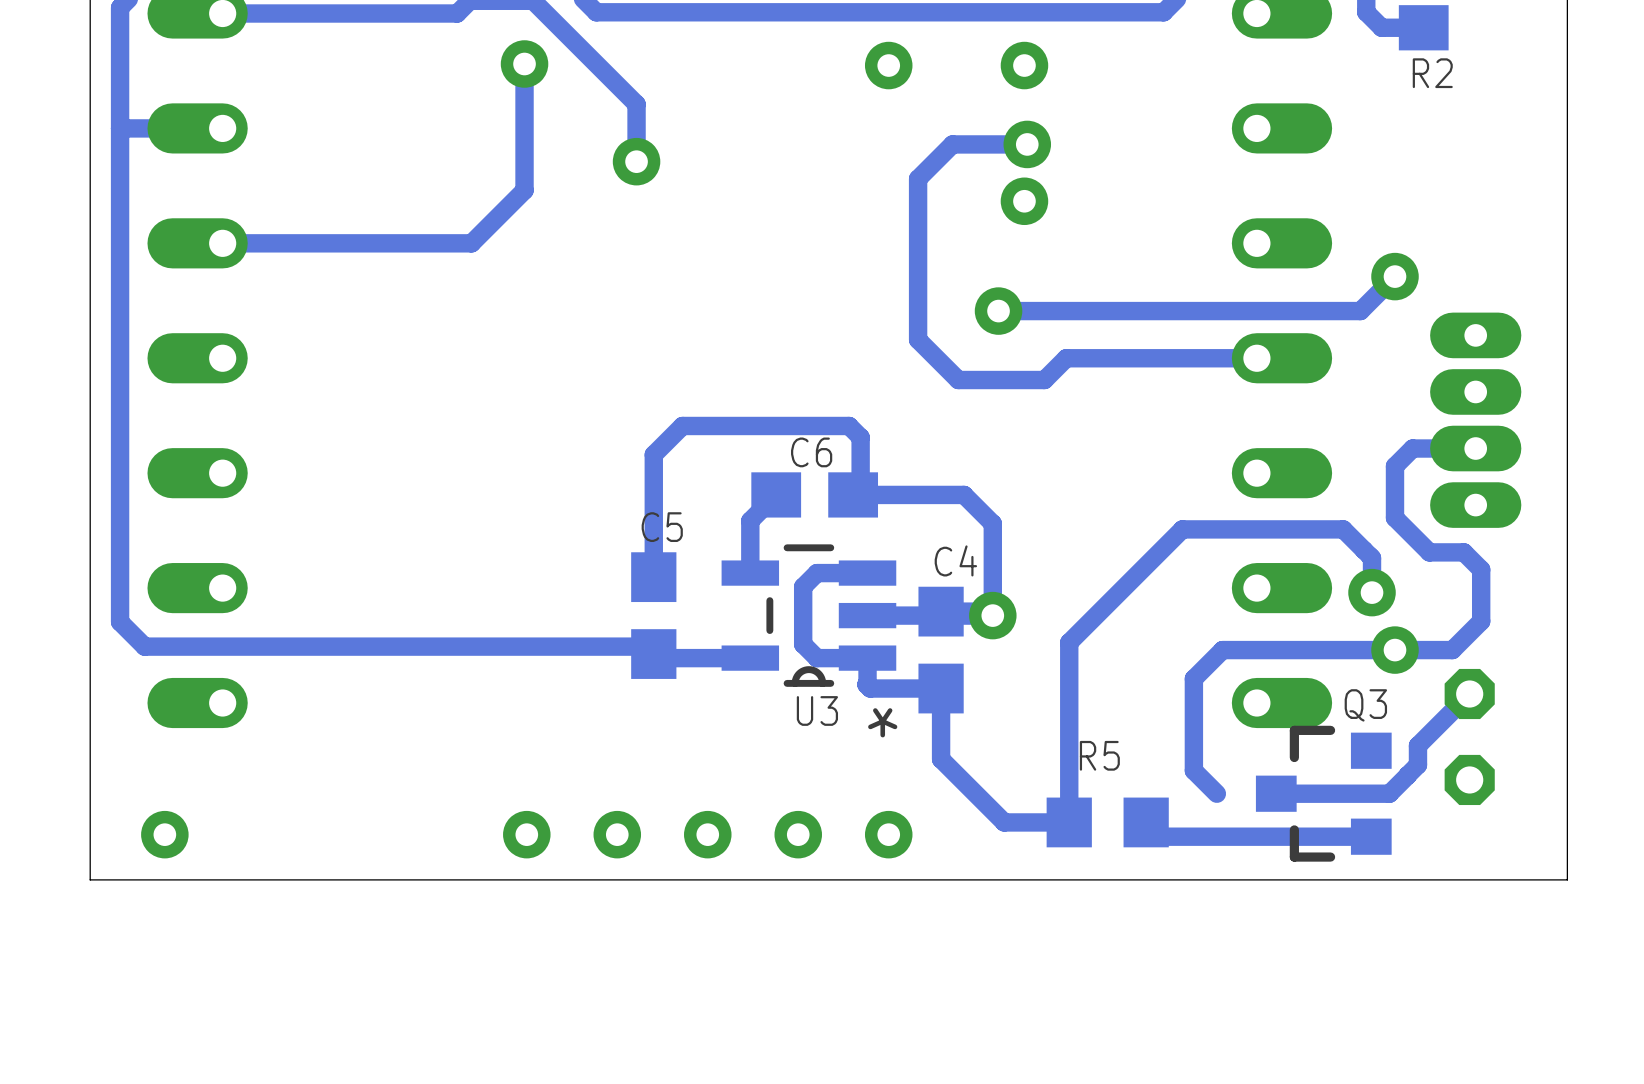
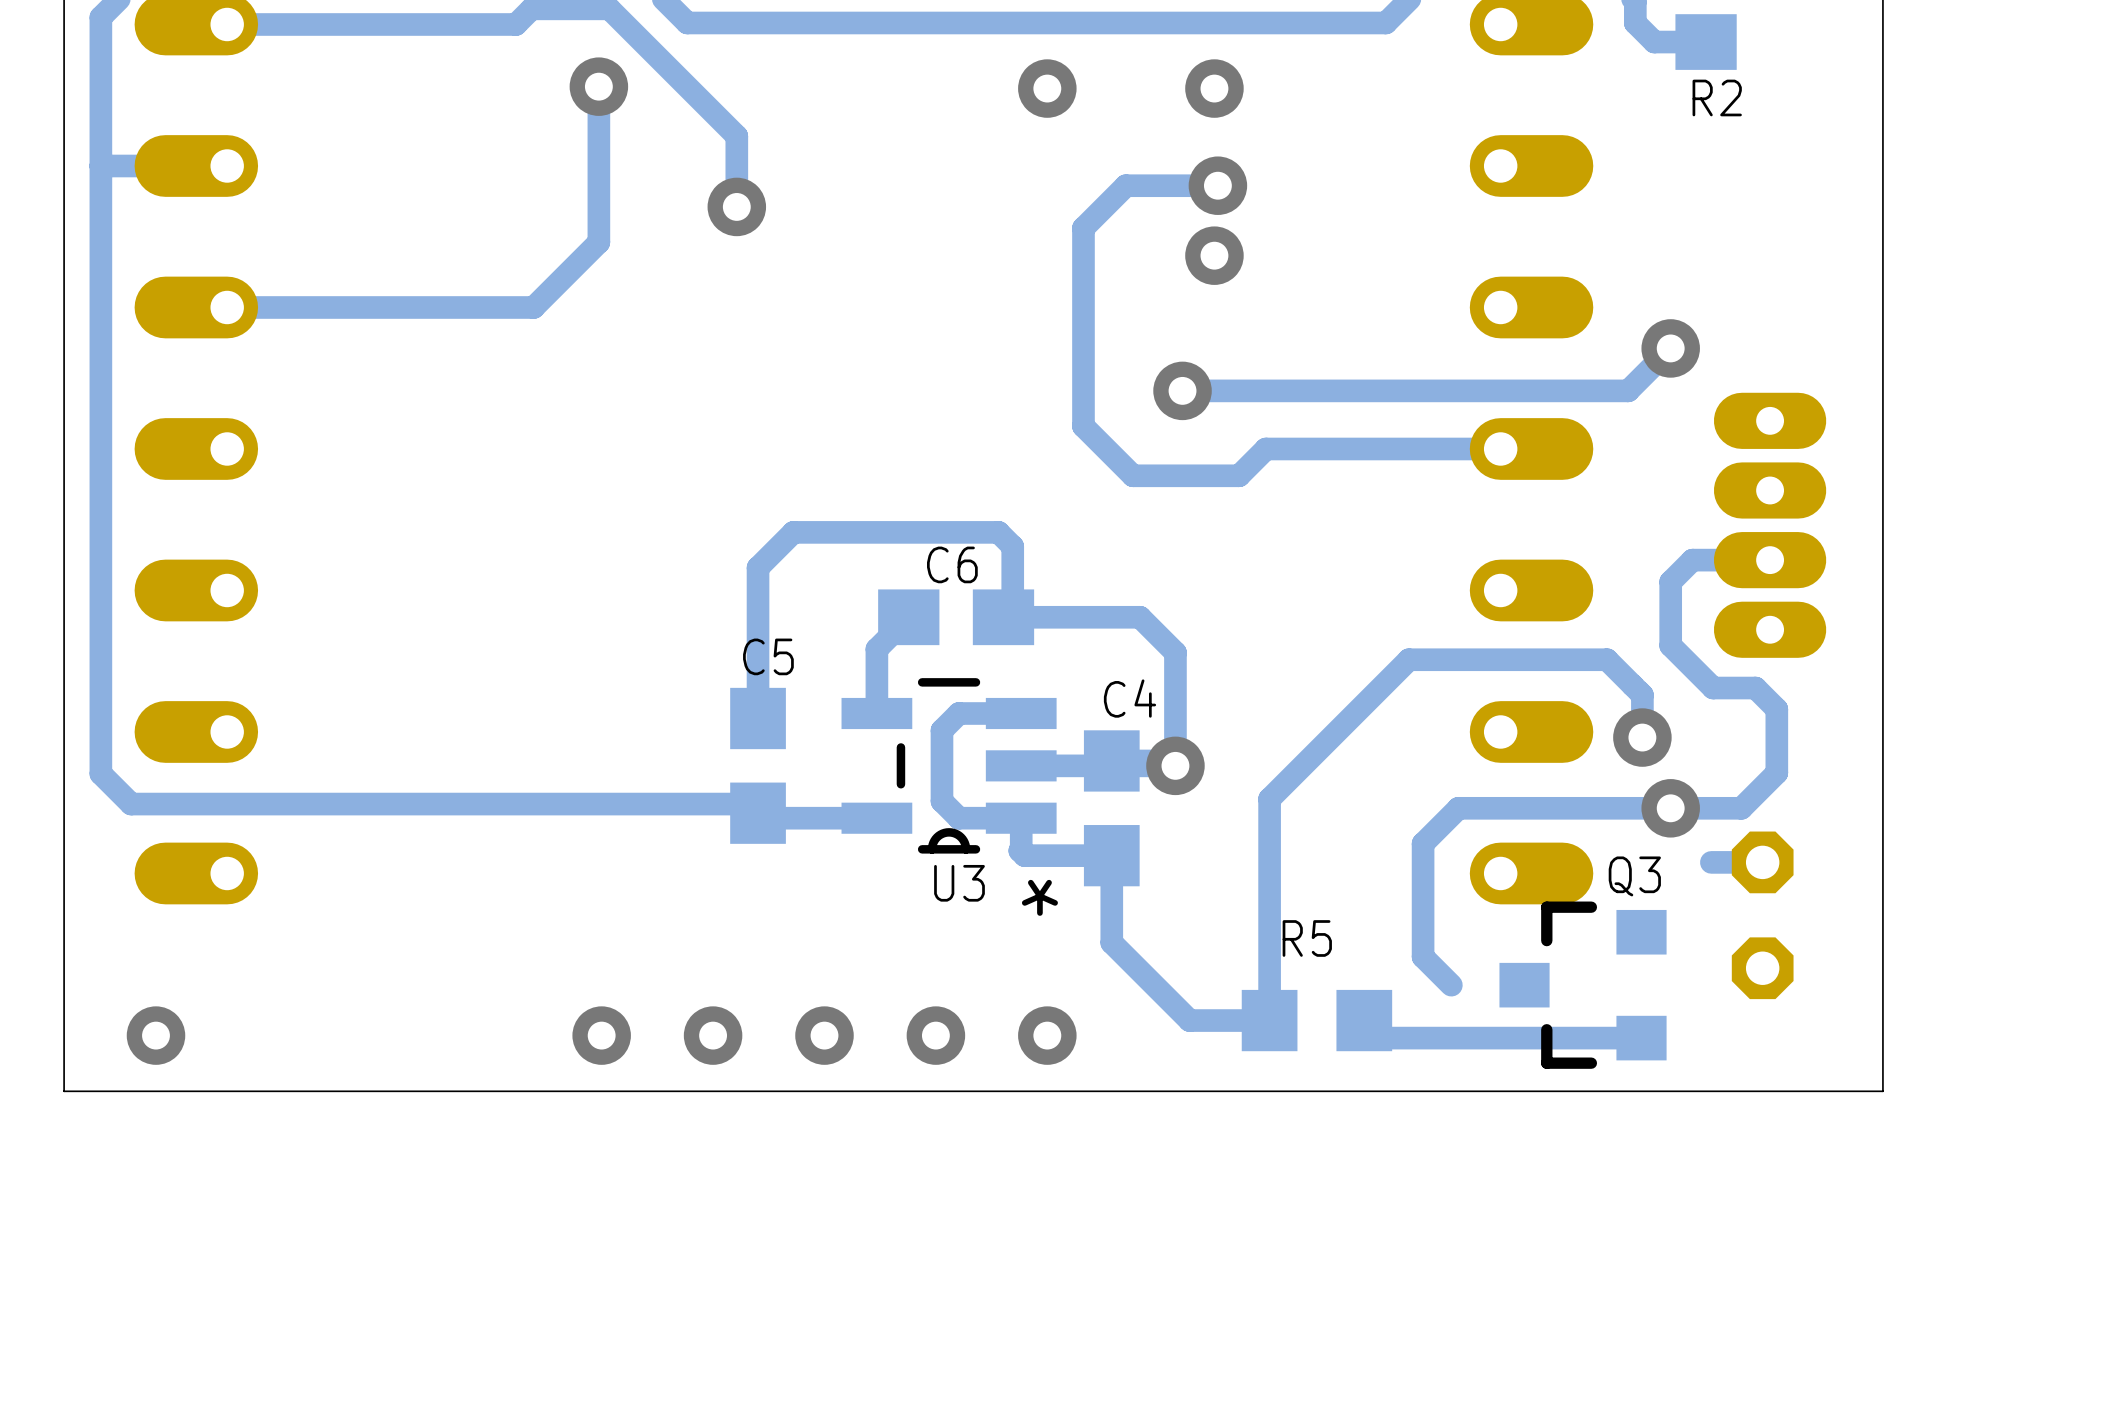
track: (1469, 694) (1417, 745) (1417, 764) (1389, 793) (1276, 793) -> (1762, 862) (1711, 862)

